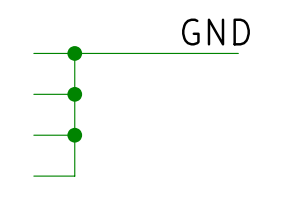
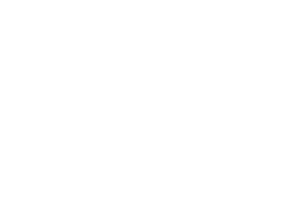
label: GND (215, 32) -> none
wire: (33, 53) (238, 53) -> none
wire: (74, 53) (74, 176) (33, 176) -> none
junction: (74, 53) -> none
wire: (33, 94) (74, 94) -> none
junction: (74, 94) -> none
wire: (33, 135) (74, 135) -> none
junction: (74, 135) -> none

